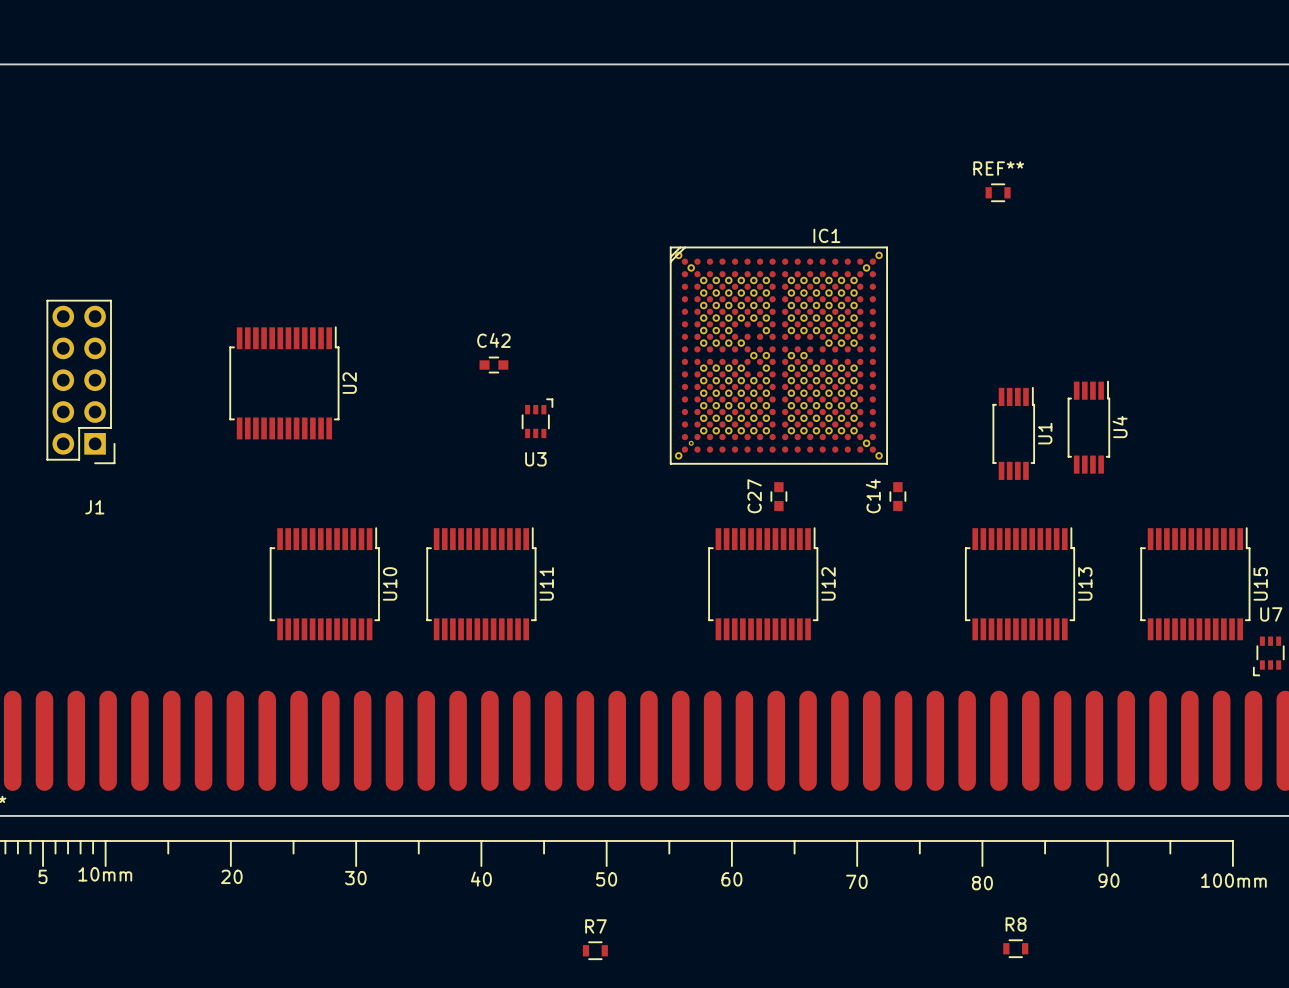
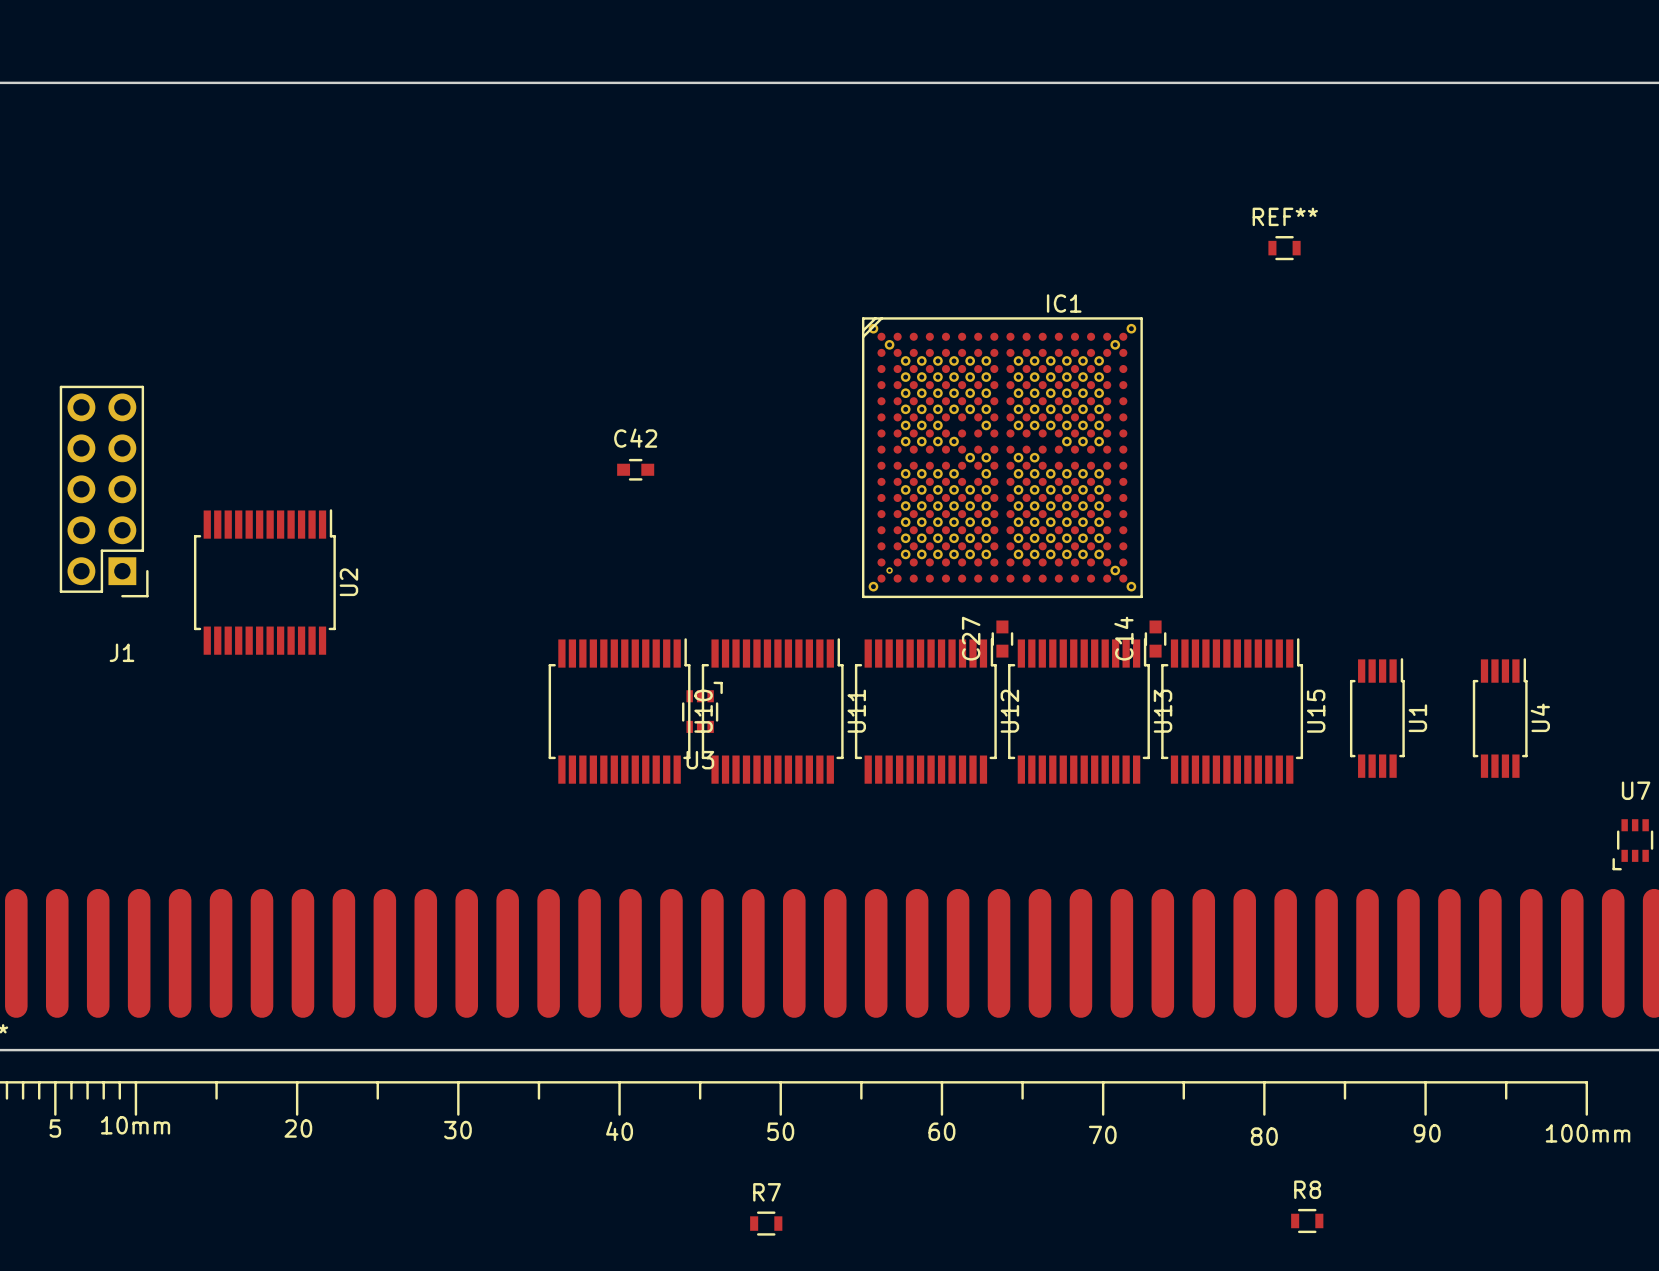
U2 position: (284, 382) -> (264, 582)
U3 position: (537, 418) -> (702, 707)
U4 position: (1088, 427) -> (1500, 717)
U1 position: (1013, 433) -> (1377, 717)
U10 position: (324, 583) -> (619, 710)
U11 position: (481, 583) -> (772, 710)
U12 position: (763, 583) -> (925, 710)
U13 position: (1020, 583) -> (1078, 710)
U15 position: (1195, 583) -> (1232, 710)

